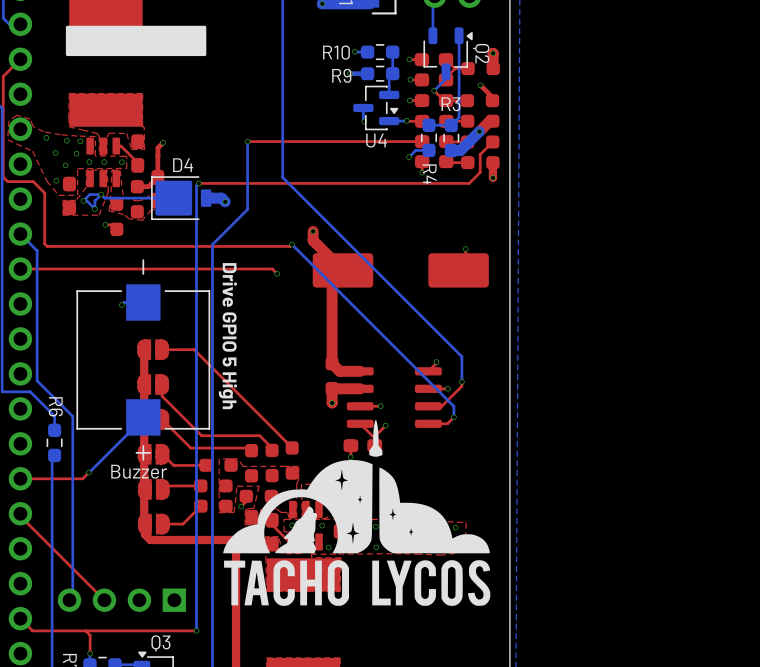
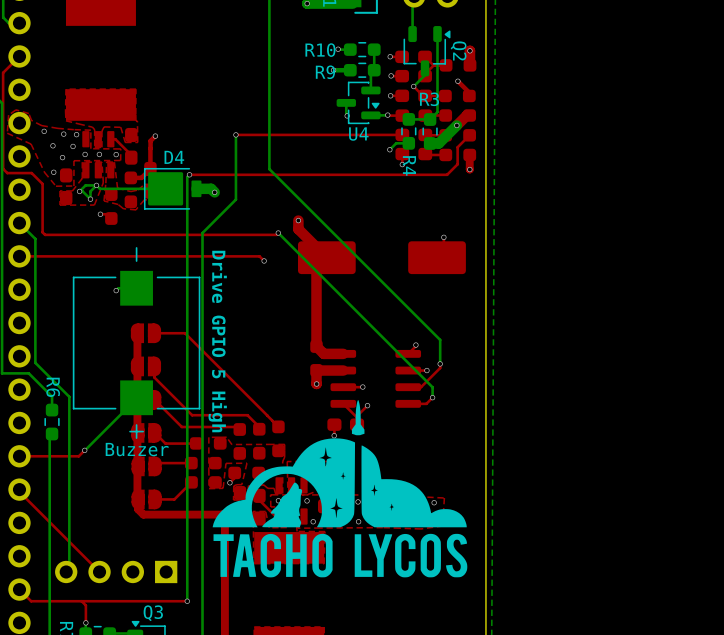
drawing: [65, 25, 207, 57] -> none

